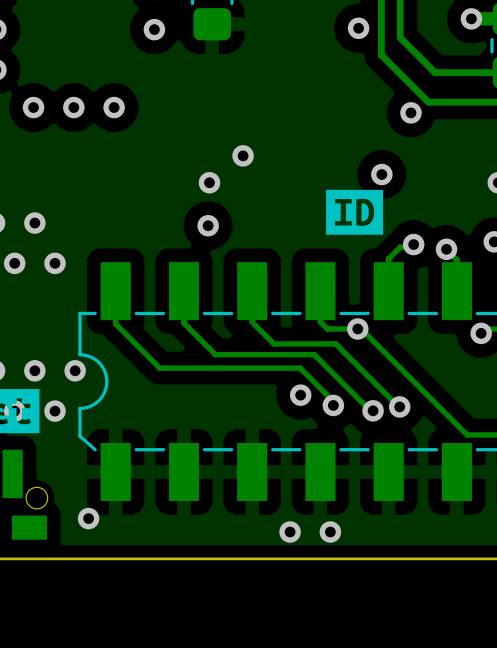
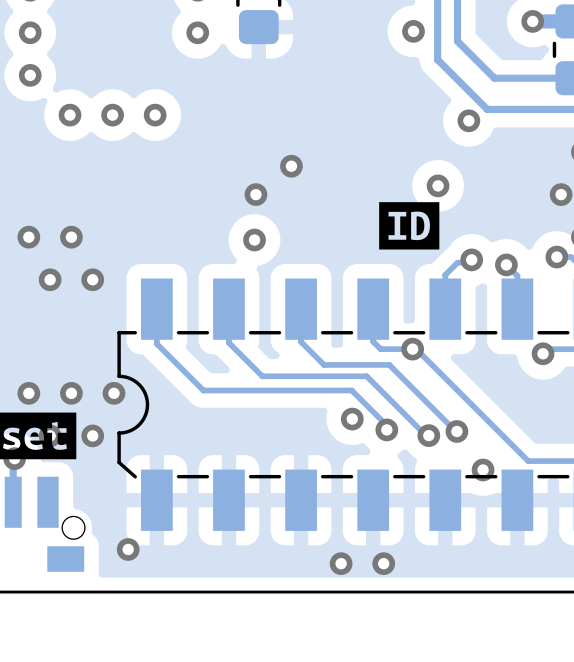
via: none -> (483, 469)

